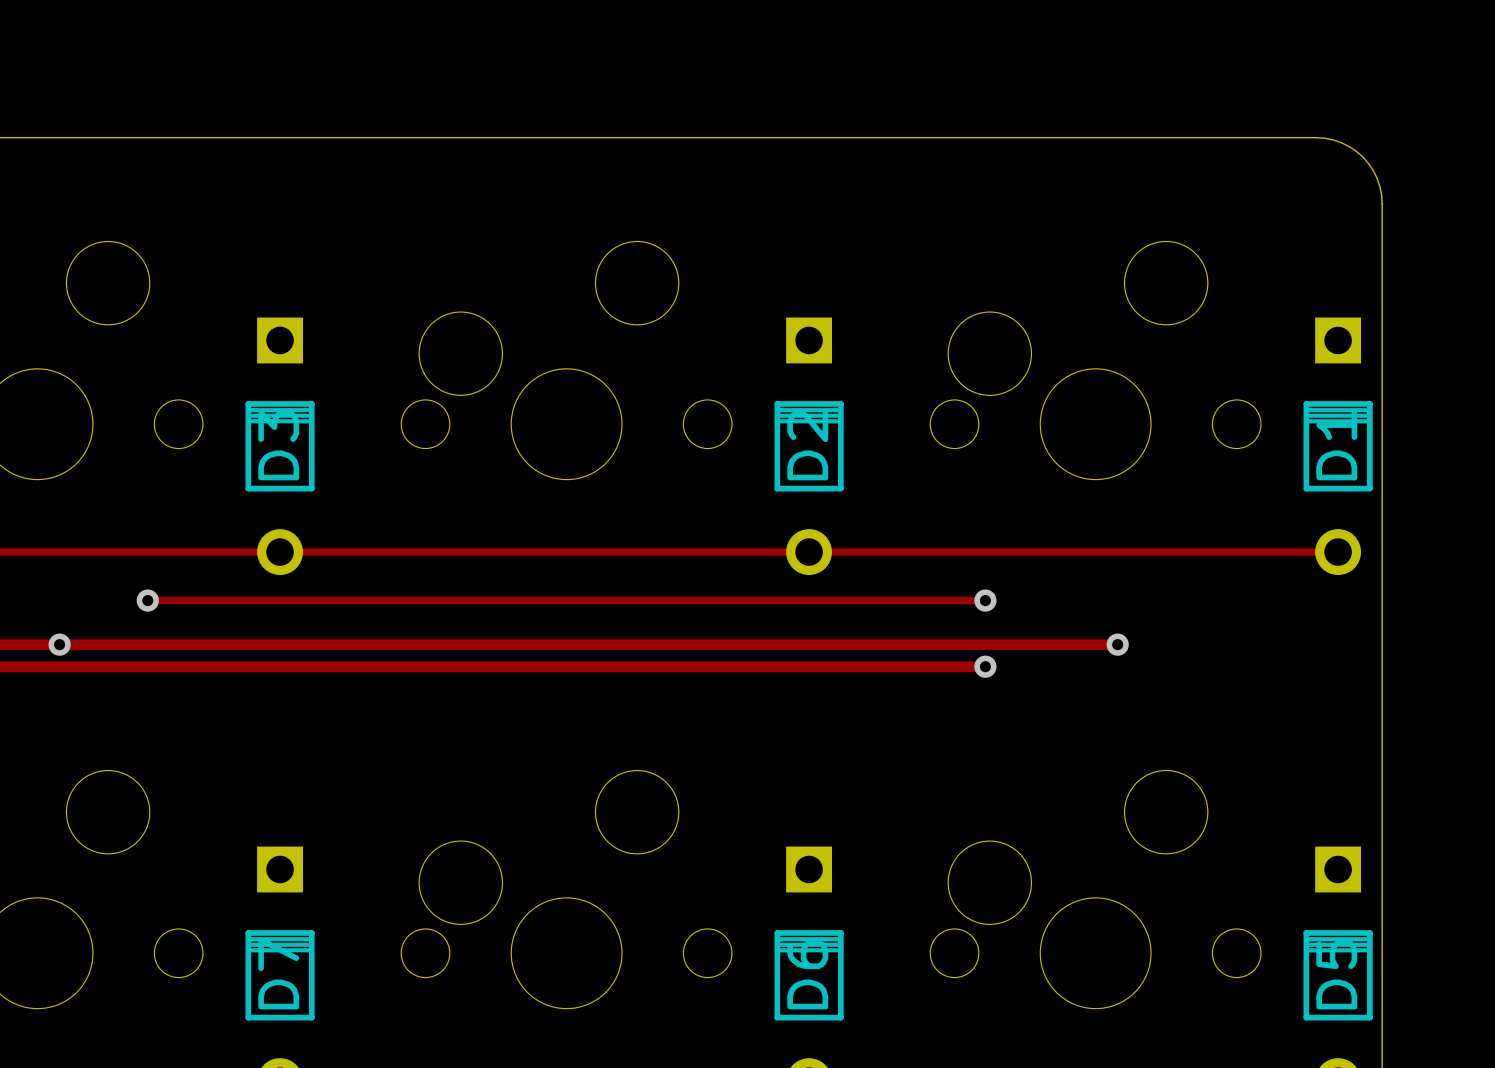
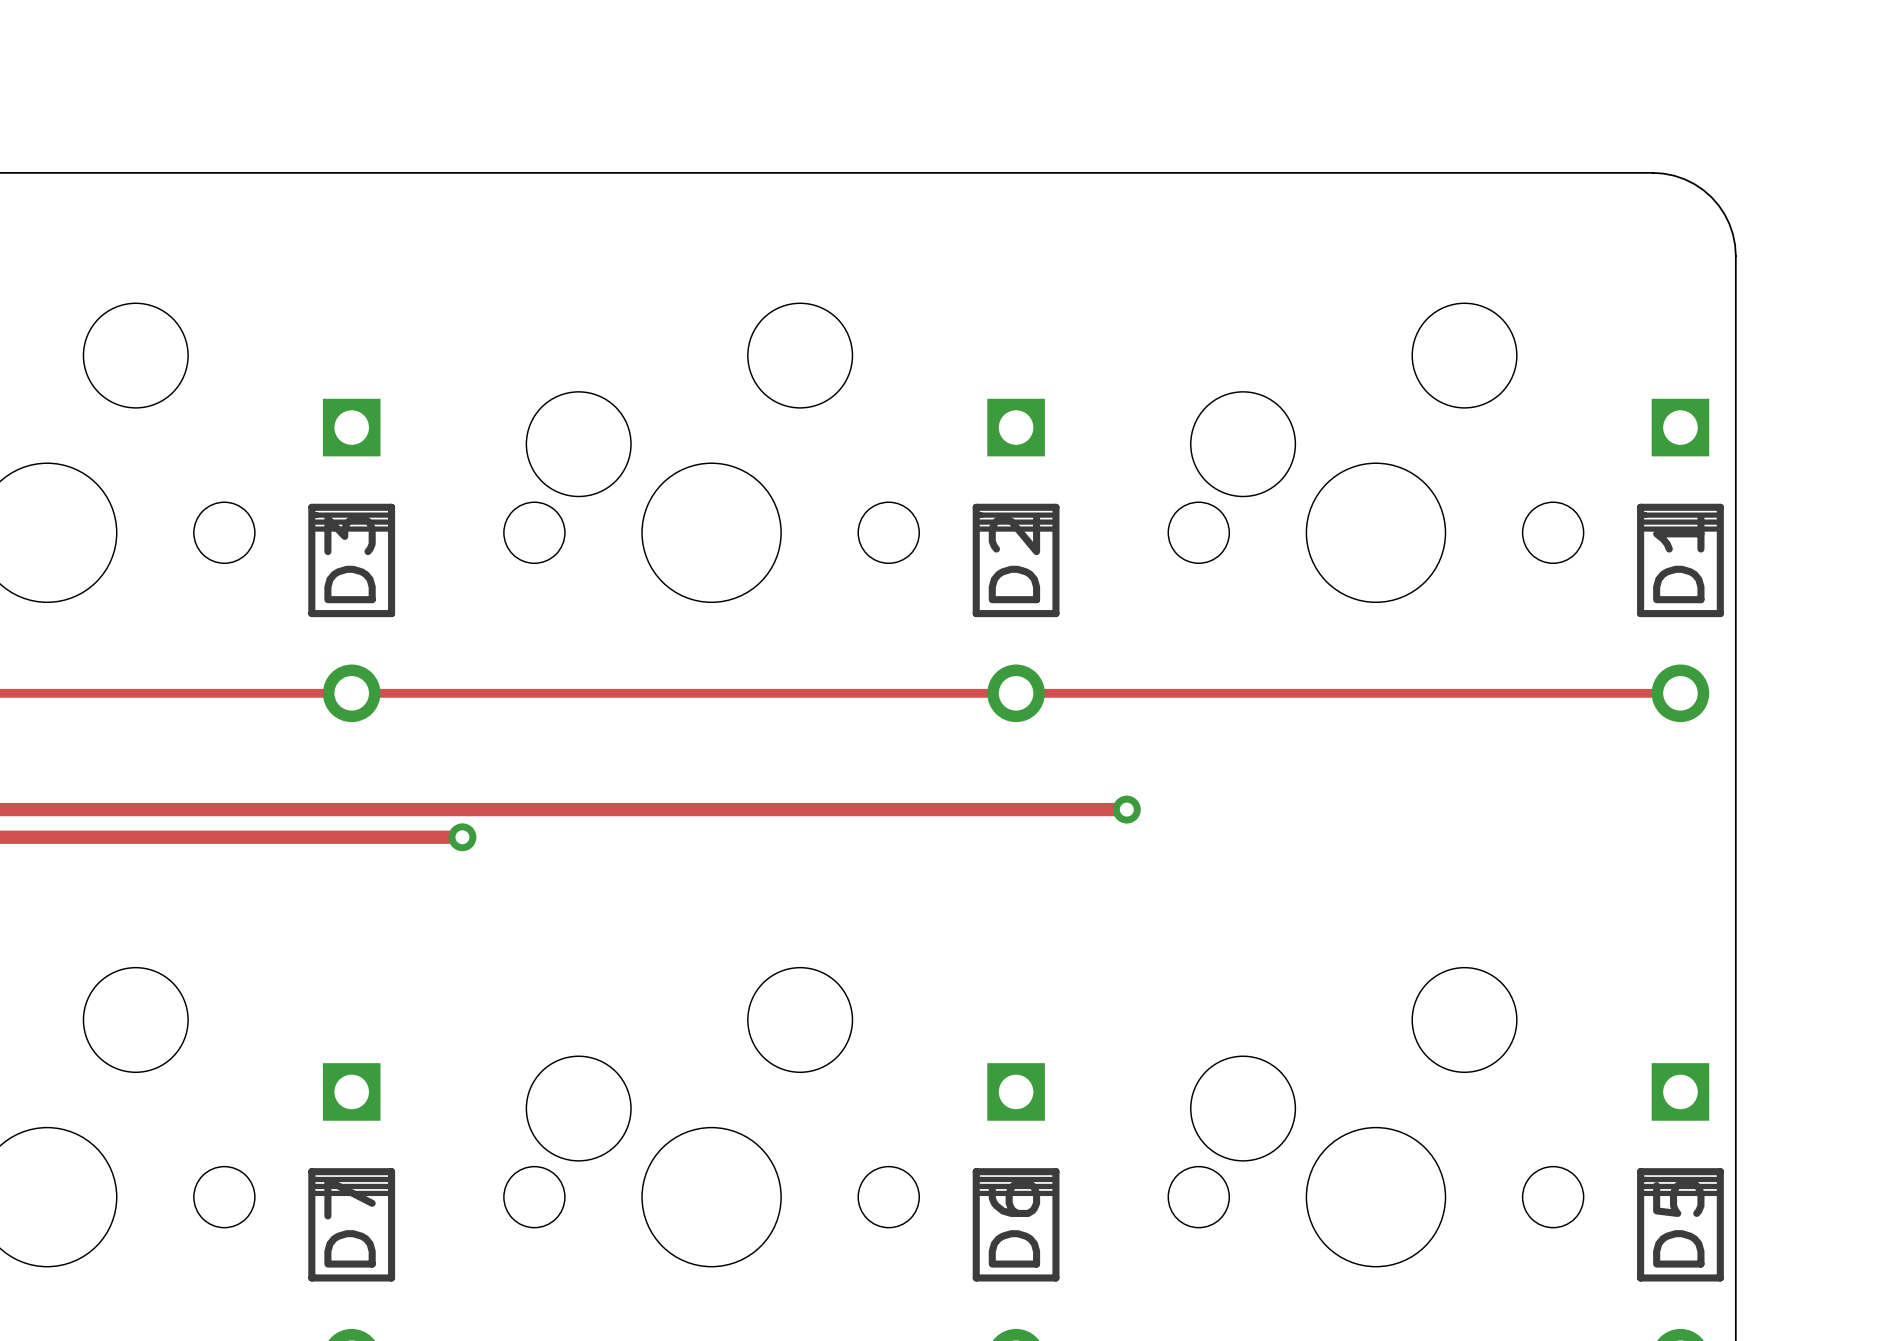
track: (147, 600) (985, 600) -> none
via: (147, 600) -> none
via: (985, 600) -> none
via: (59, 644) -> none
track: (897, 644) (1117, 644) -> none
via: none -> (1126, 809)
via: (1117, 644) -> none
track: (368, 666) (985, 666) -> none
via: none -> (462, 837)
via: (985, 666) -> none

